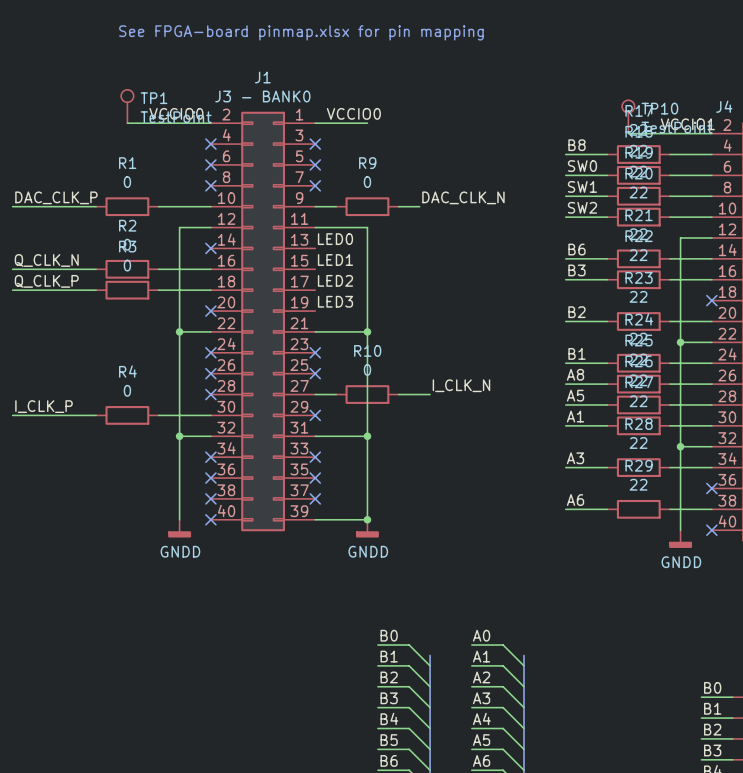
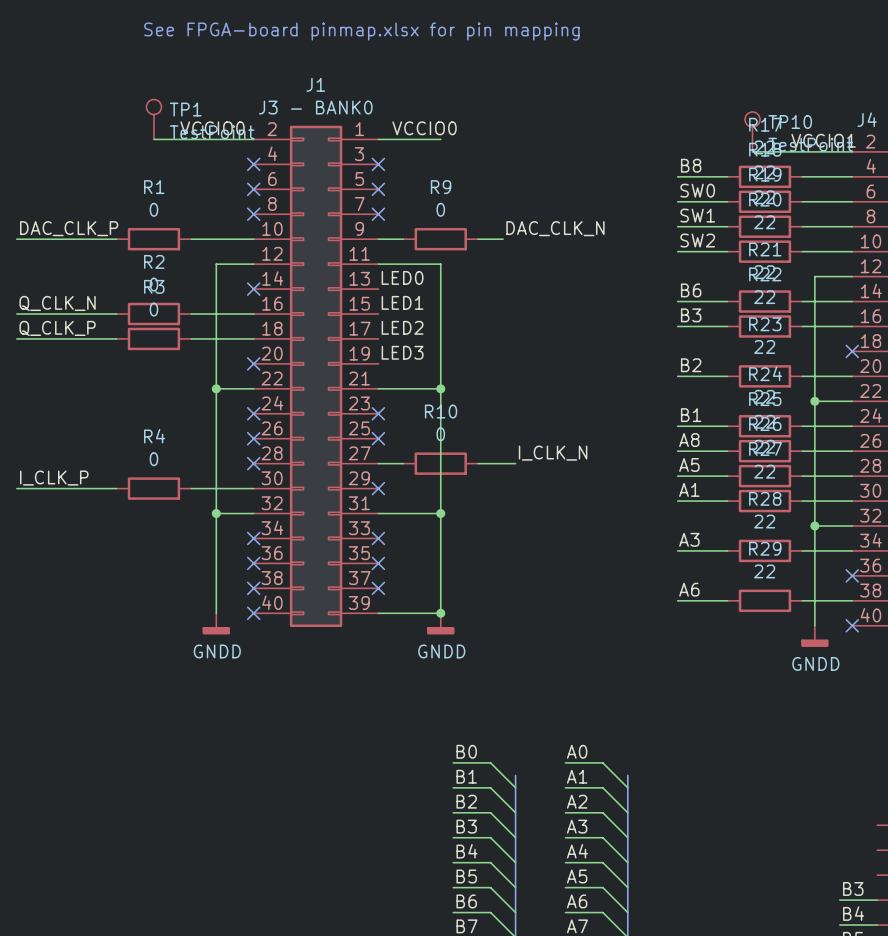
label: B0 (712, 687) -> none
wire: (701, 697) (732, 697) -> none
label: B1 (712, 708) -> none
wire: (701, 718) (732, 718) -> none
label: B2 (712, 729) -> none
wire: (701, 738) (732, 738) -> none

